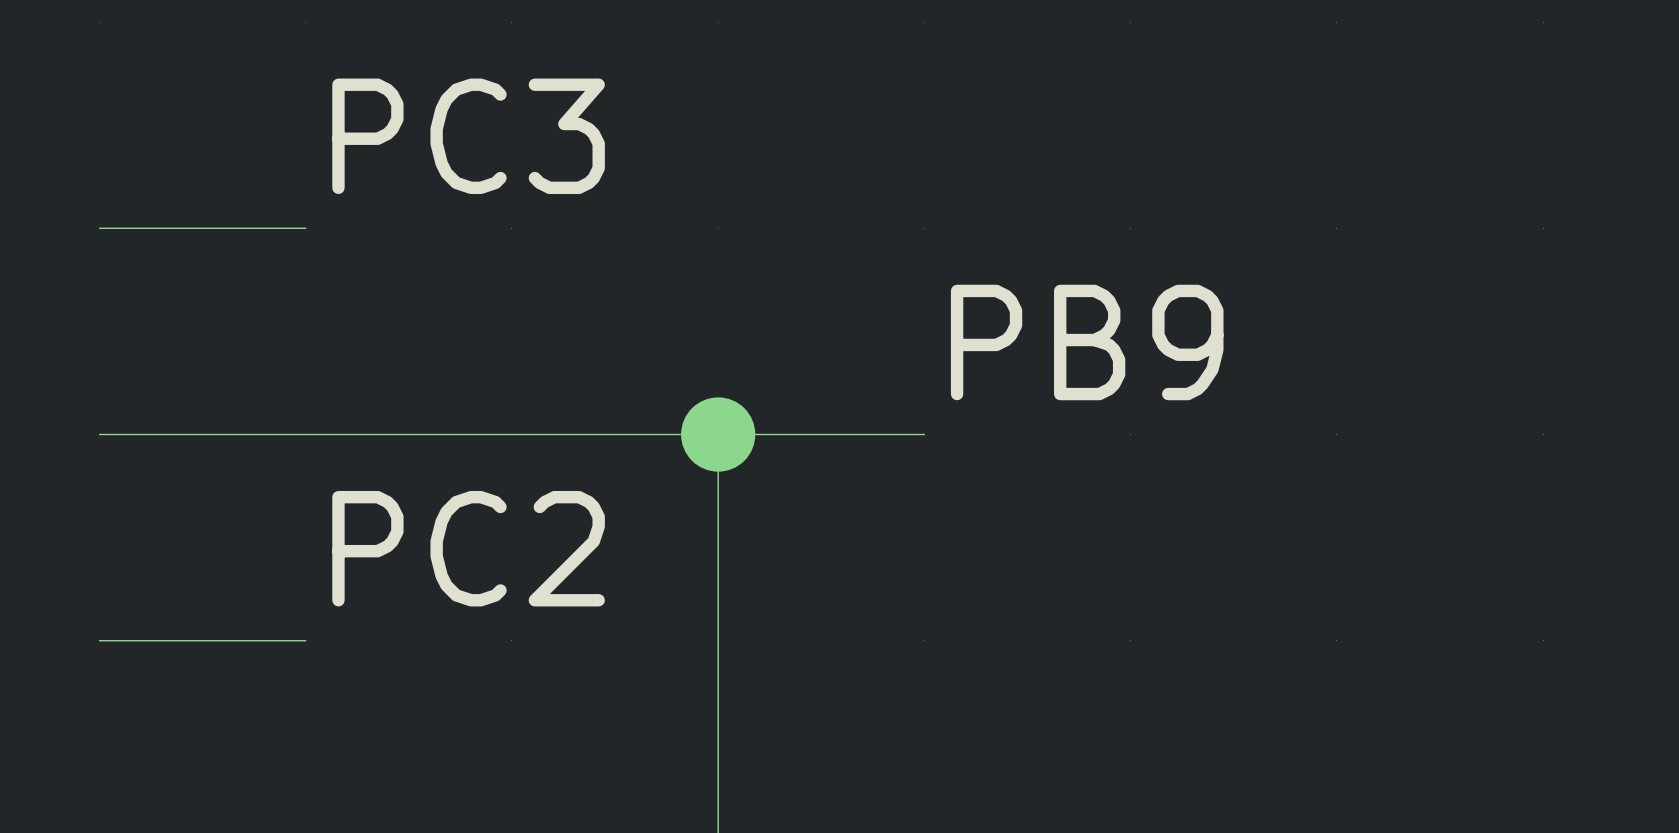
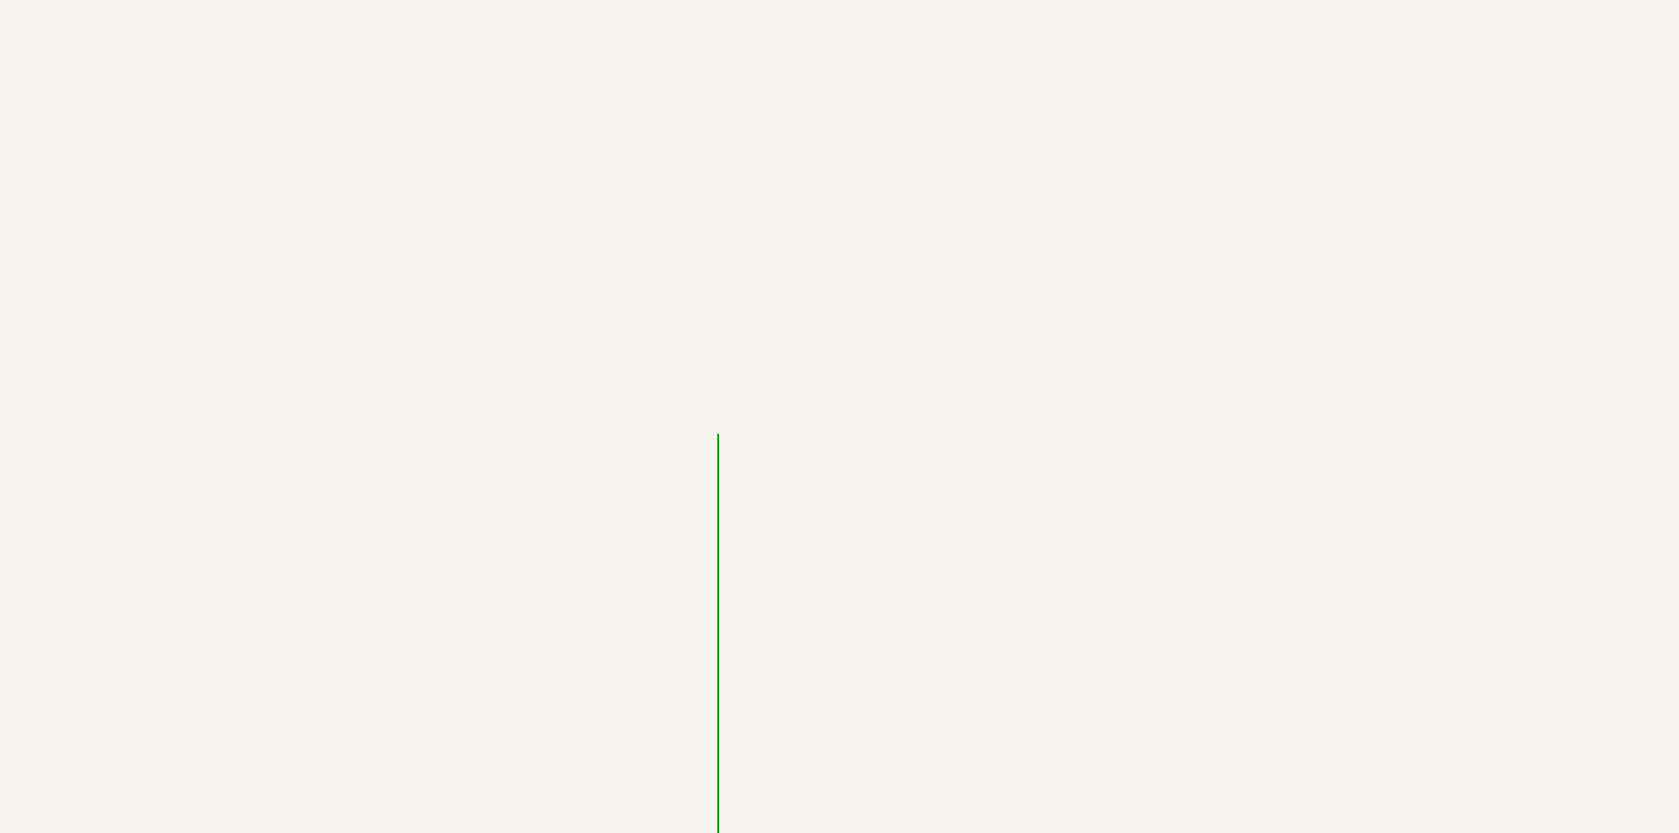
label: PC3 (468, 136) -> none
wire: (99, 228) (305, 228) -> none
label: PB9 (1087, 342) -> none
wire: (99, 434) (924, 434) -> none
junction: (718, 434) -> none
label: PC2 (468, 548) -> none
wire: (99, 640) (305, 640) -> none

